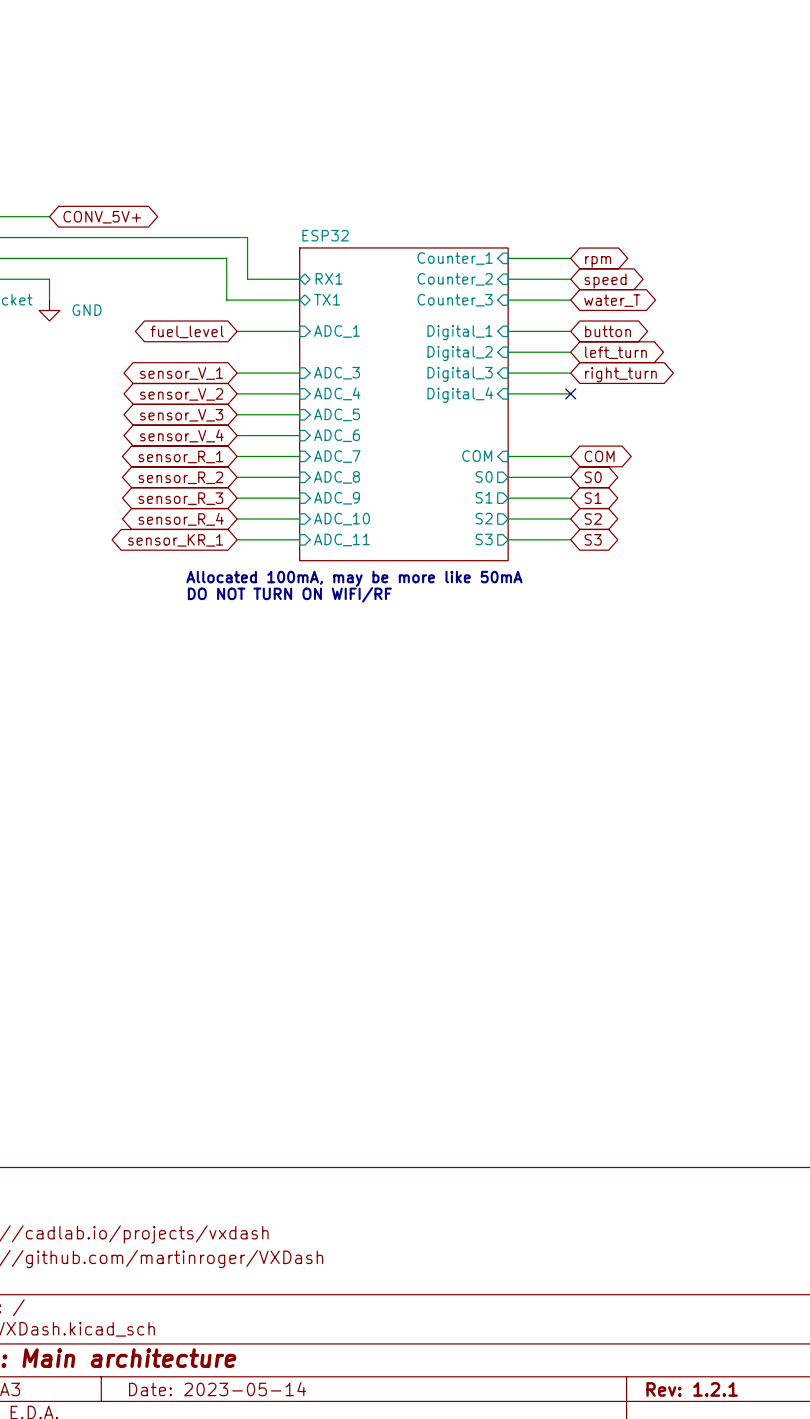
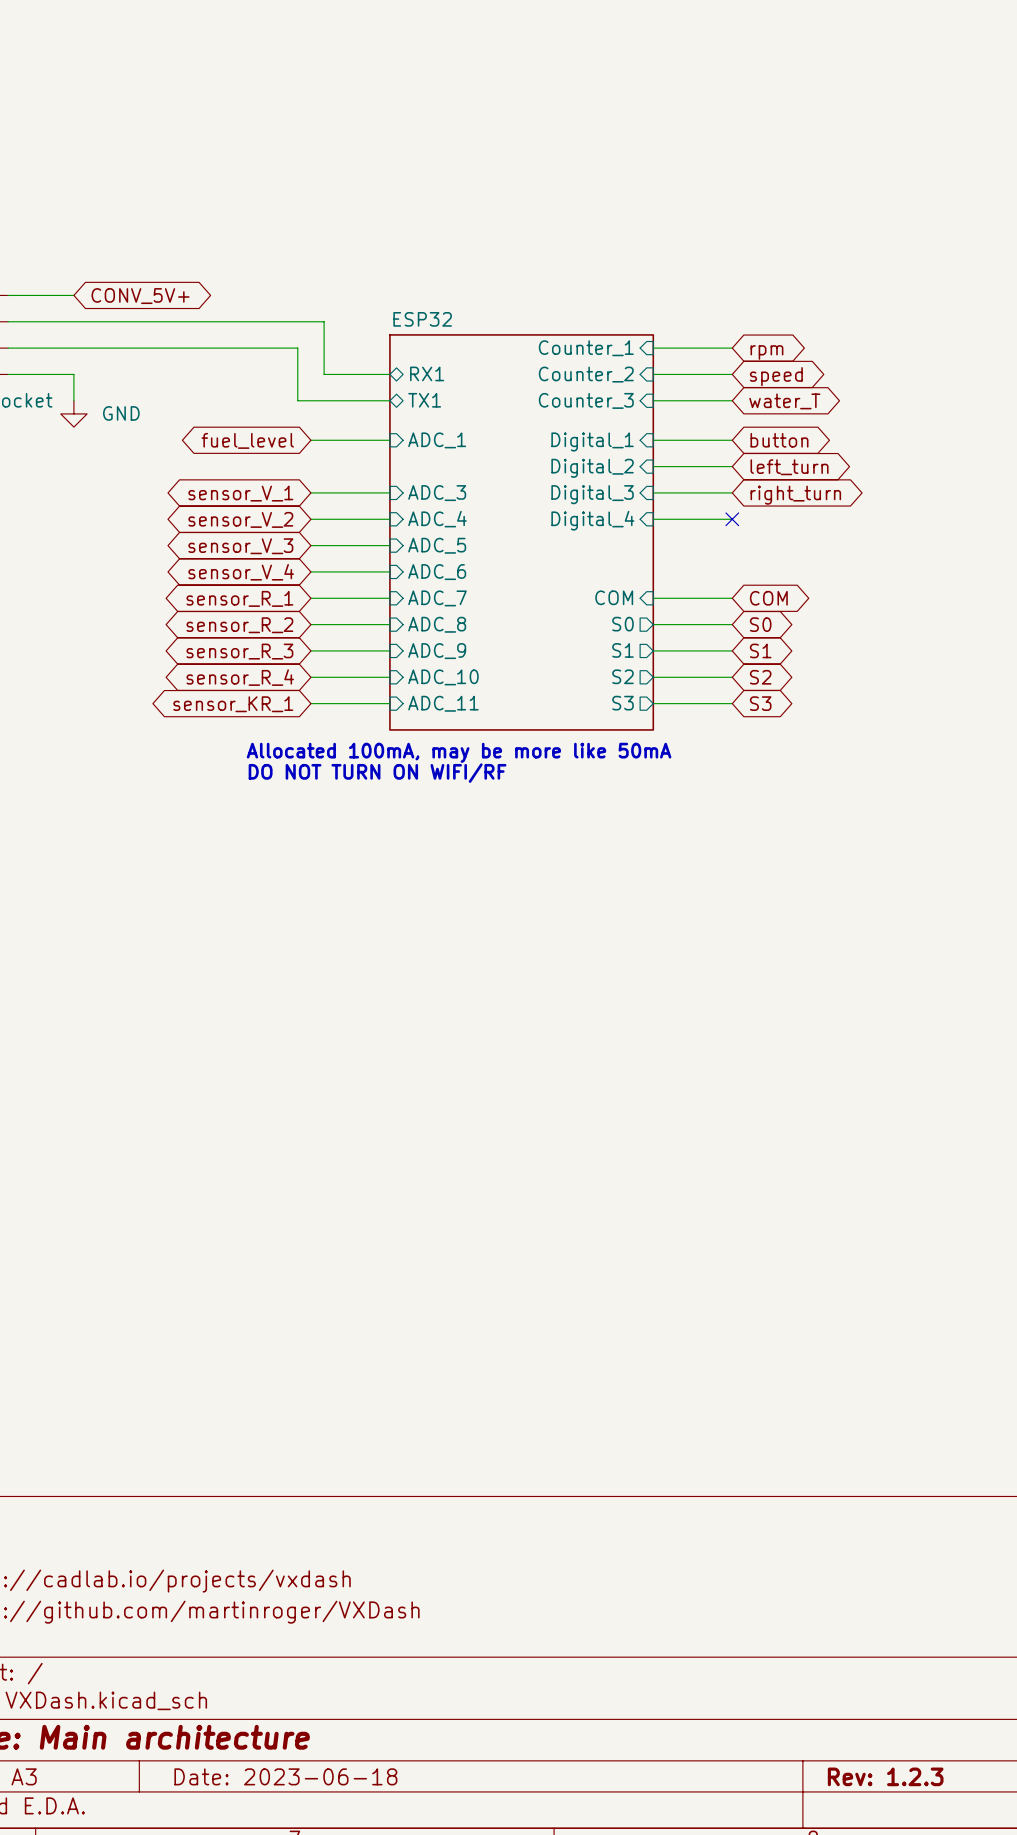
title block: Date: 2023-05-14 (217, 1389) -> Date: 2023-06-18 (285, 1776)
title block: Rev: 1.2.1 (692, 1389) -> Rev: 1.2.3 (885, 1776)

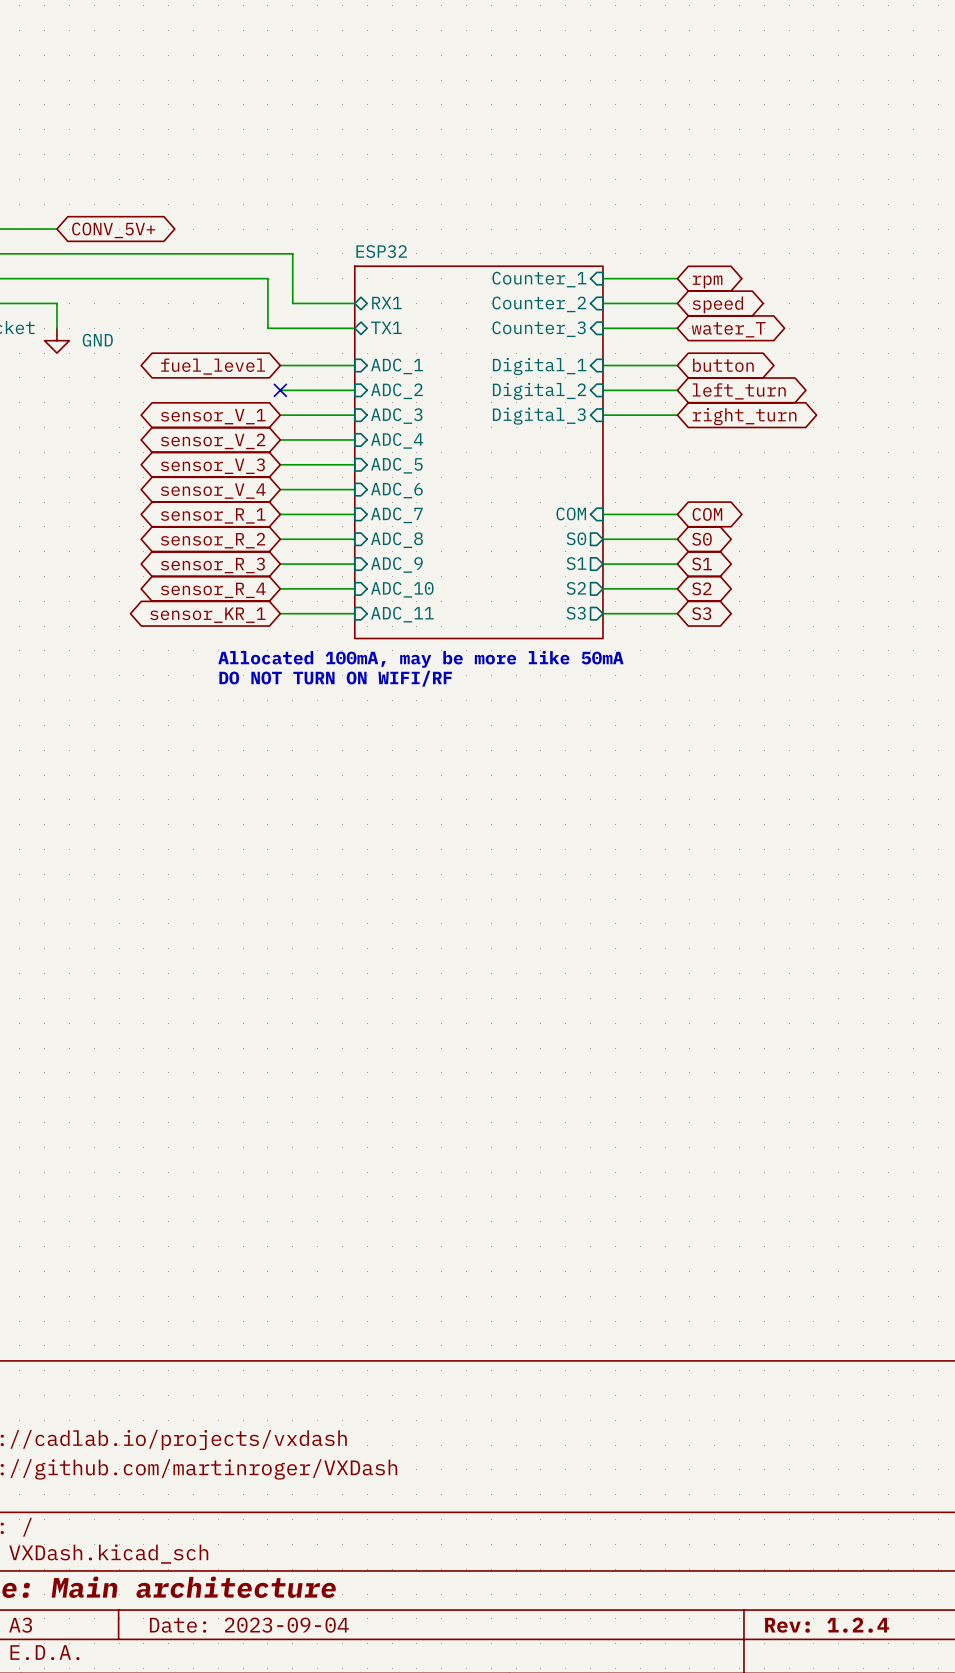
wire: none -> (280, 390) (354, 390)
no-connect mark: none -> (280, 390)
sheet pin: none -> ADC_2 (396, 391)
wire: (653, 519) (732, 519) -> none
no-connect mark: (732, 519) -> none
sheet pin: Digital_4 (592, 520) -> none
title block: Date: 2023-06-18 (285, 1776) -> Date: 2023-09-04 (249, 1625)
title block: Rev: 1.2.3 (885, 1776) -> Rev: 1.2.4 (827, 1625)

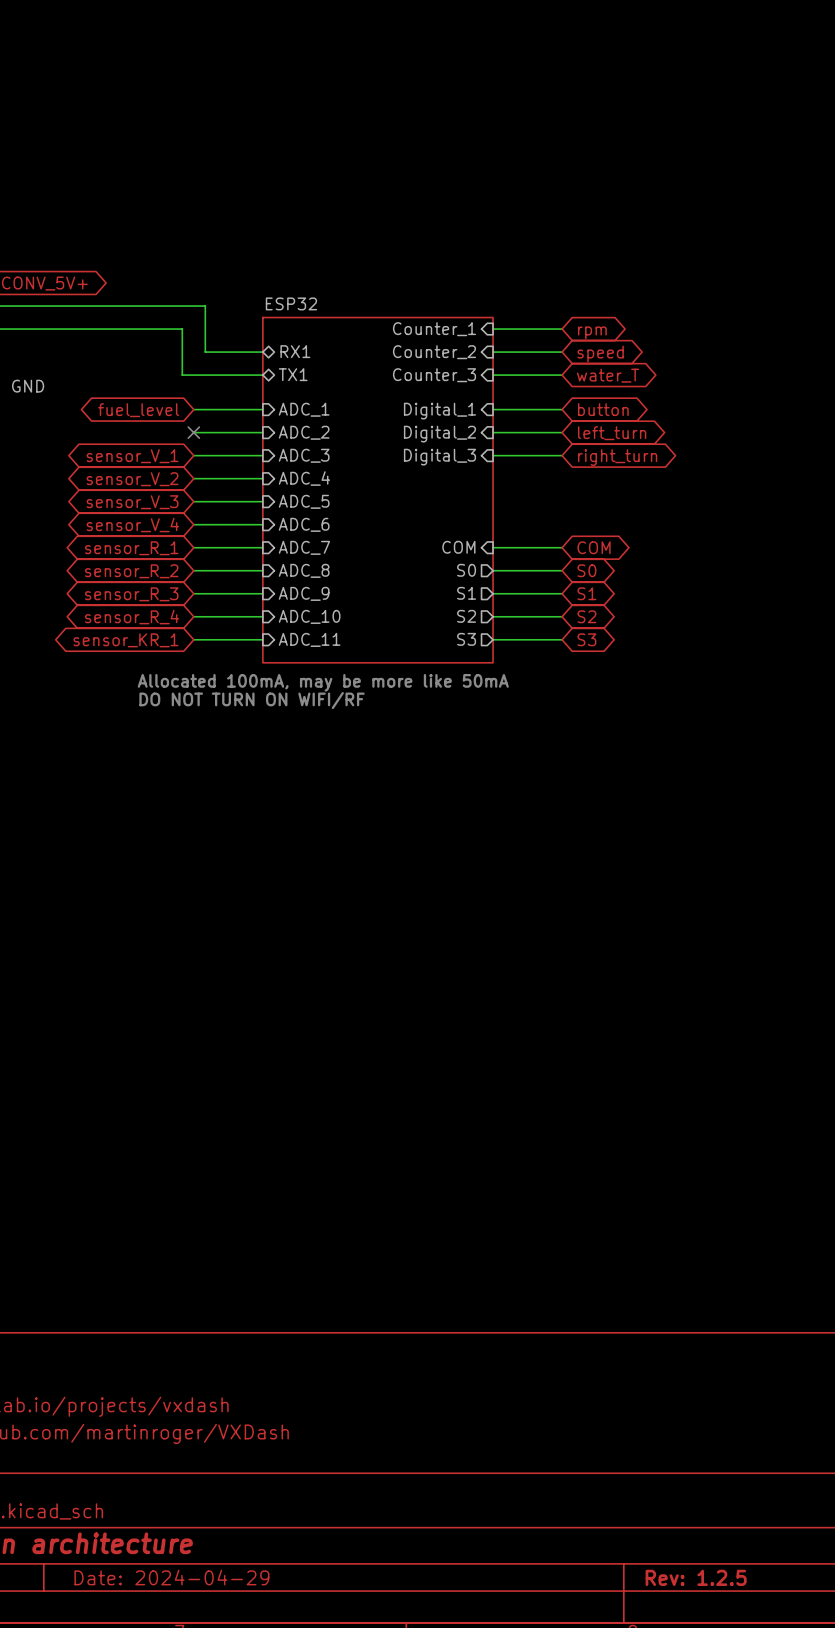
title block: Date: 2023-09-04 (249, 1625) -> Date: 2024-04-29 (171, 1577)
title block: Rev: 1.2.4 (827, 1625) -> Rev: 1.2.5 (696, 1577)

